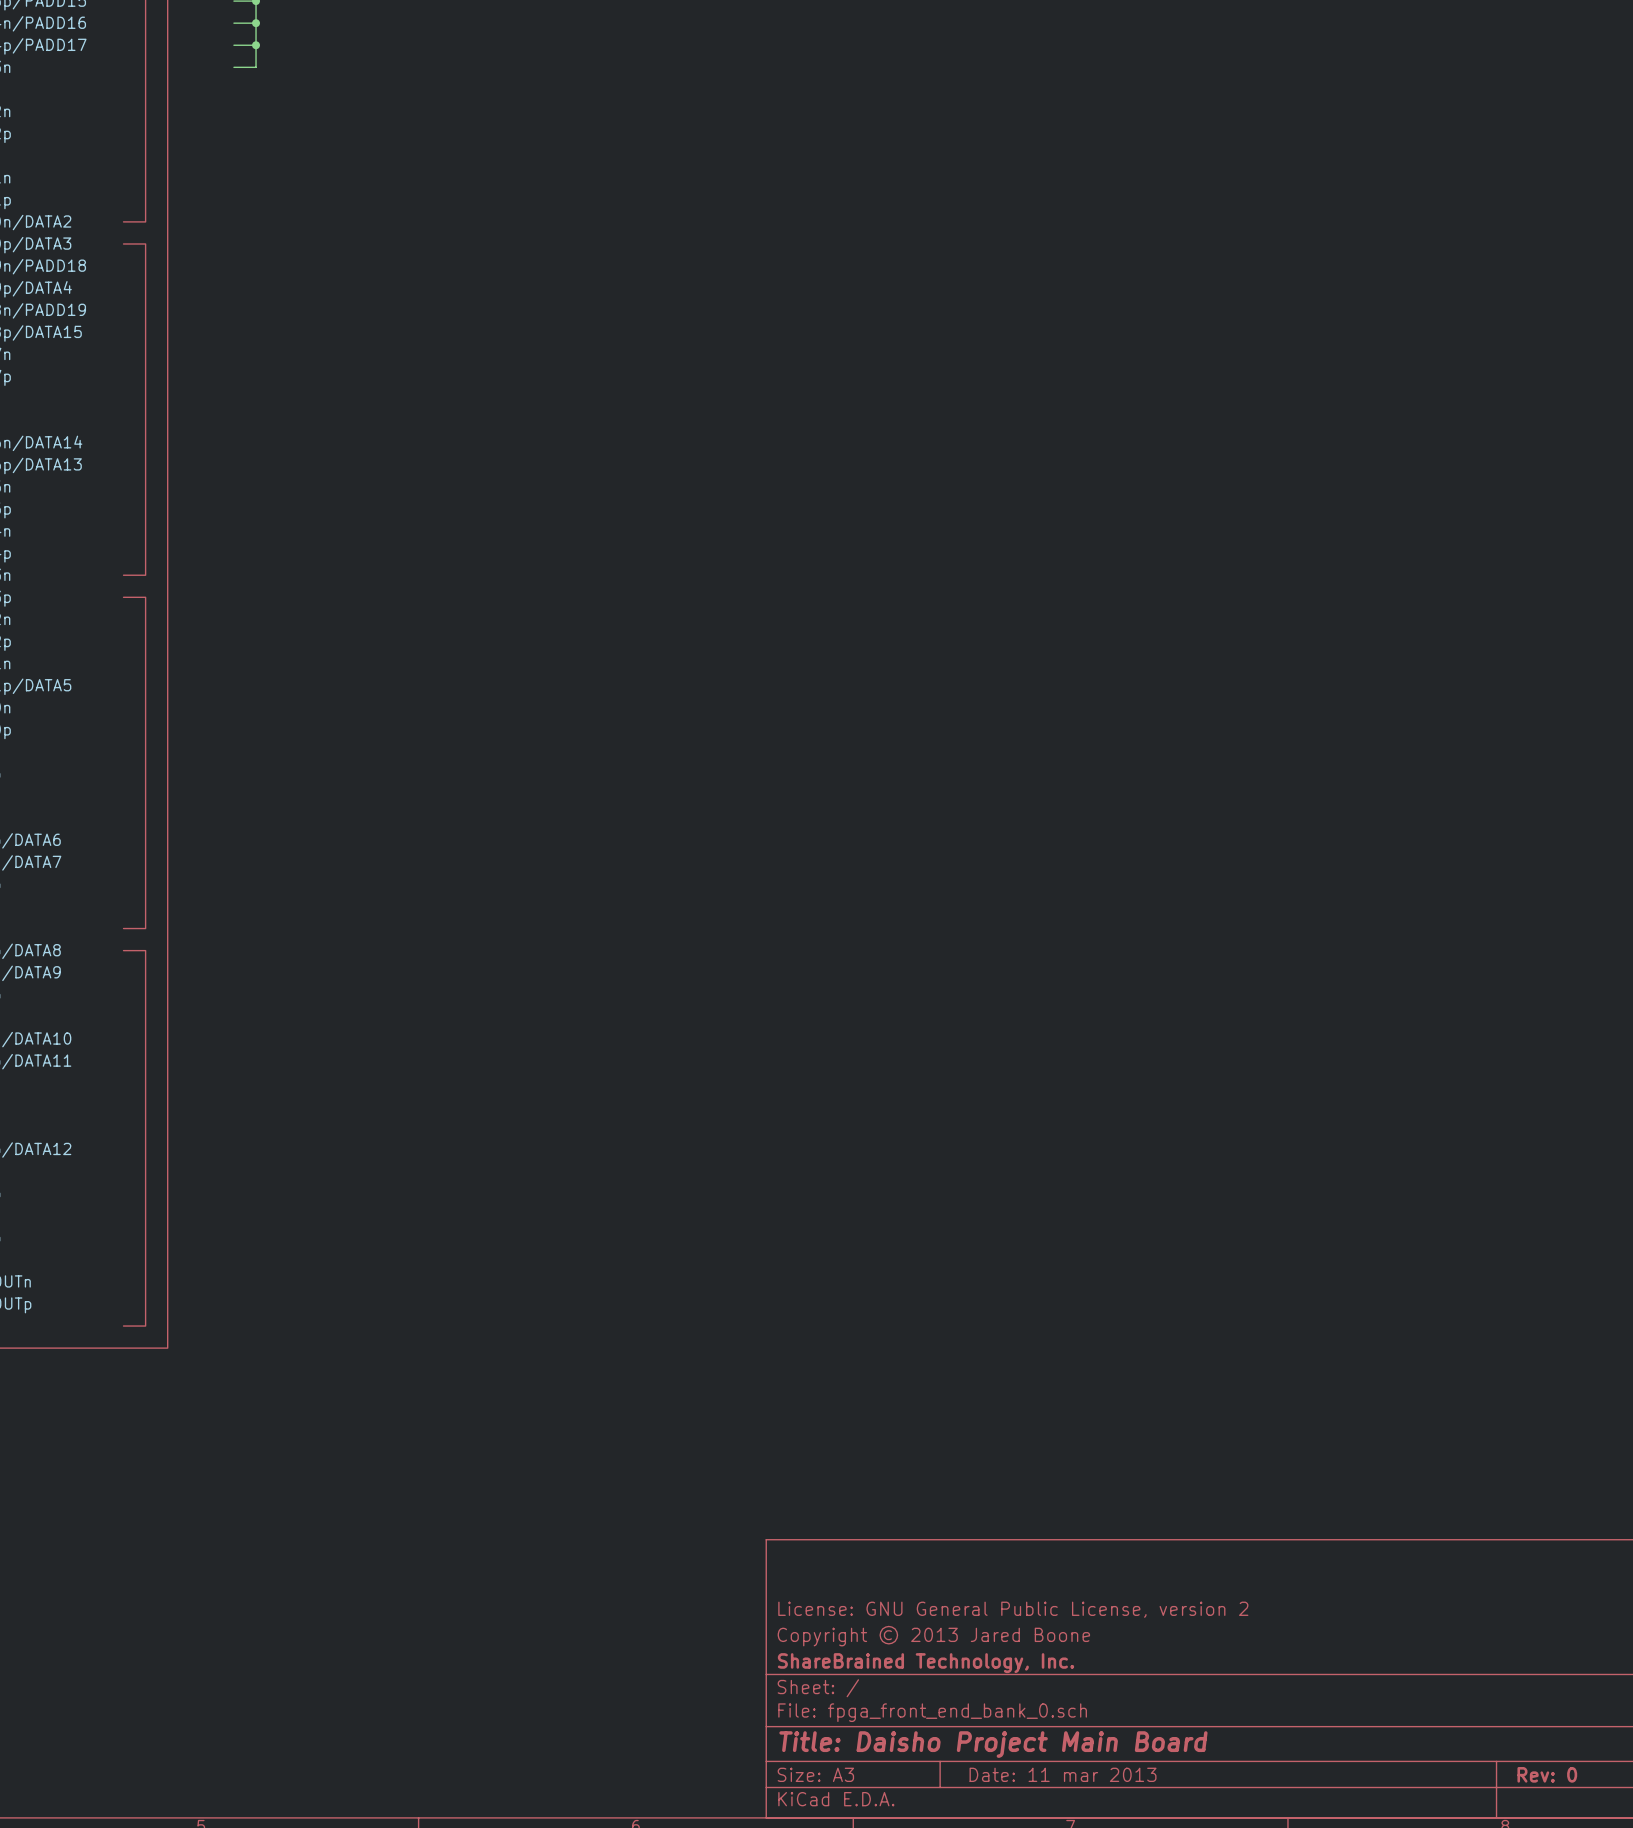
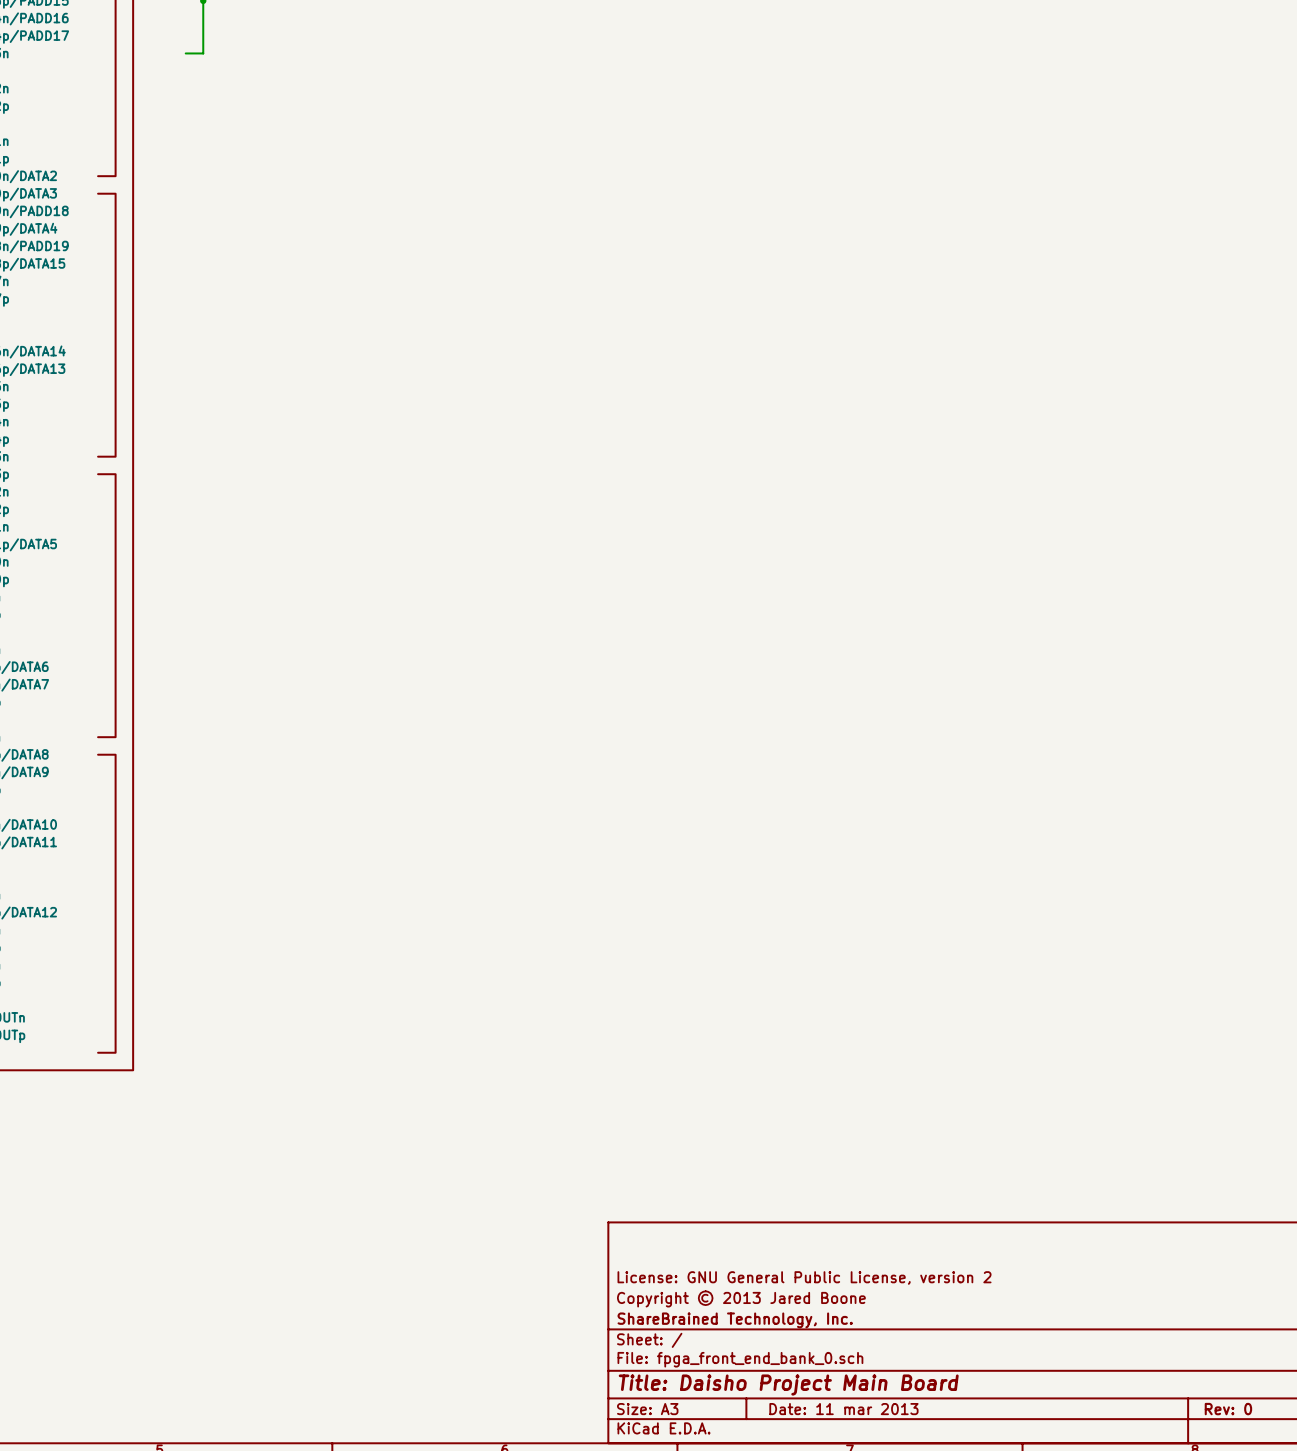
wire: (233, 1) (256, 1) -> none
wire: (233, 23) (256, 23) -> none
junction: (256, 23) -> none
wire: (233, 45) (256, 45) -> none
junction: (256, 45) -> none

